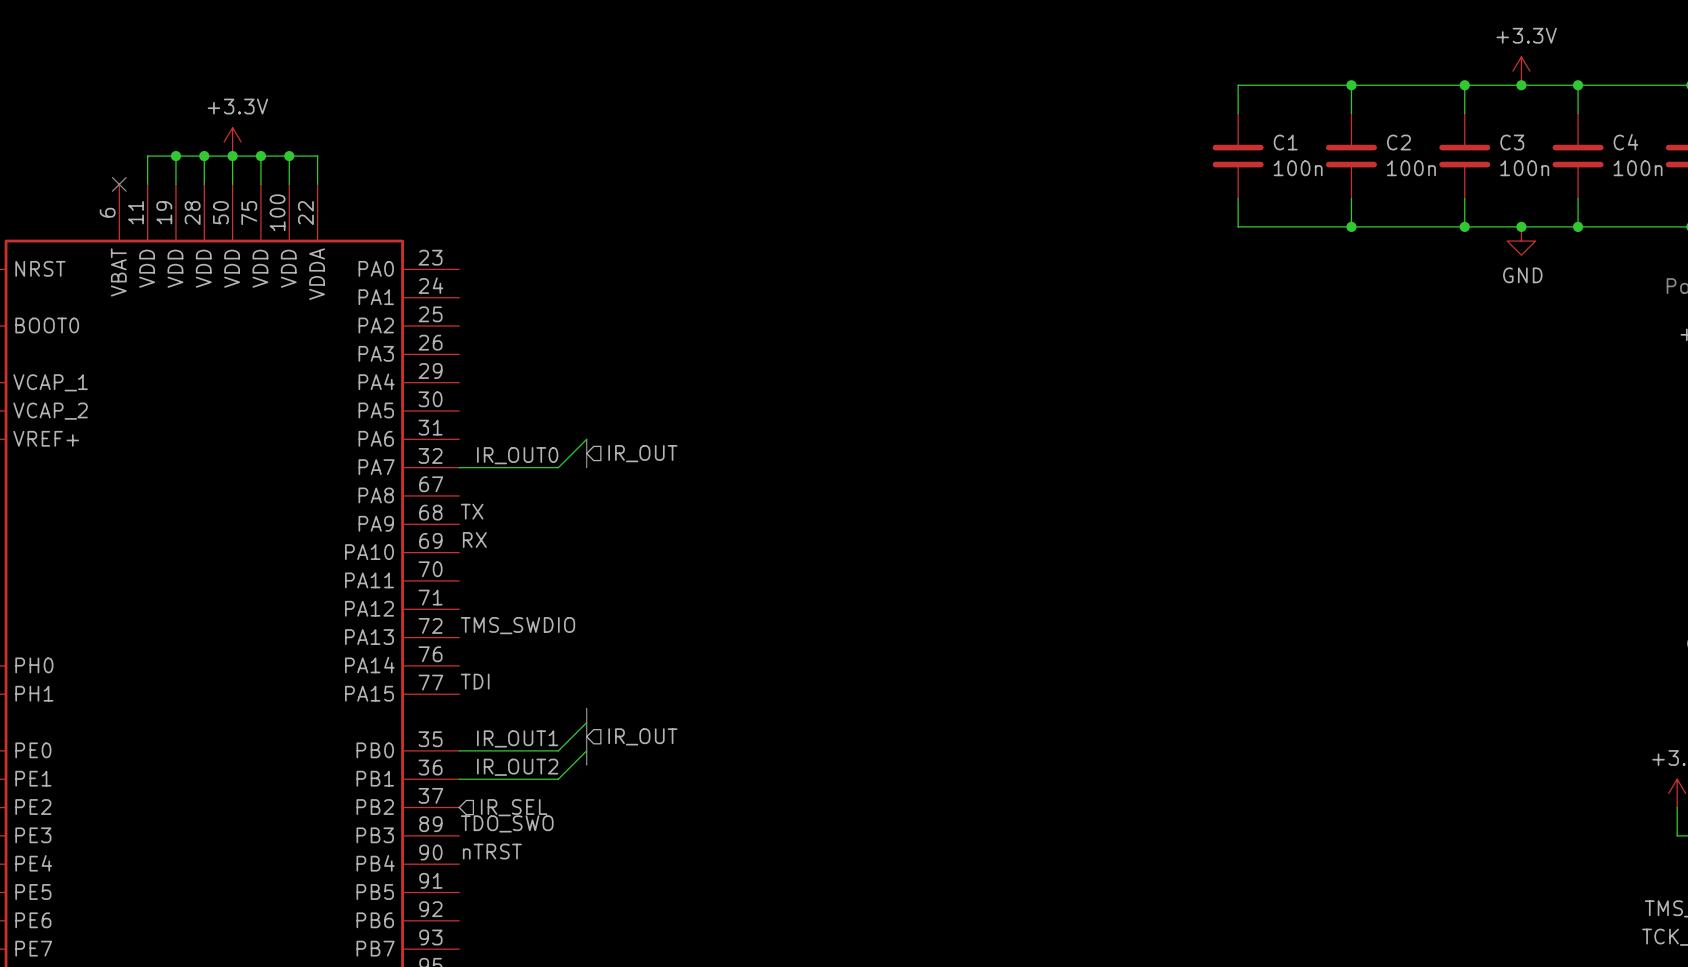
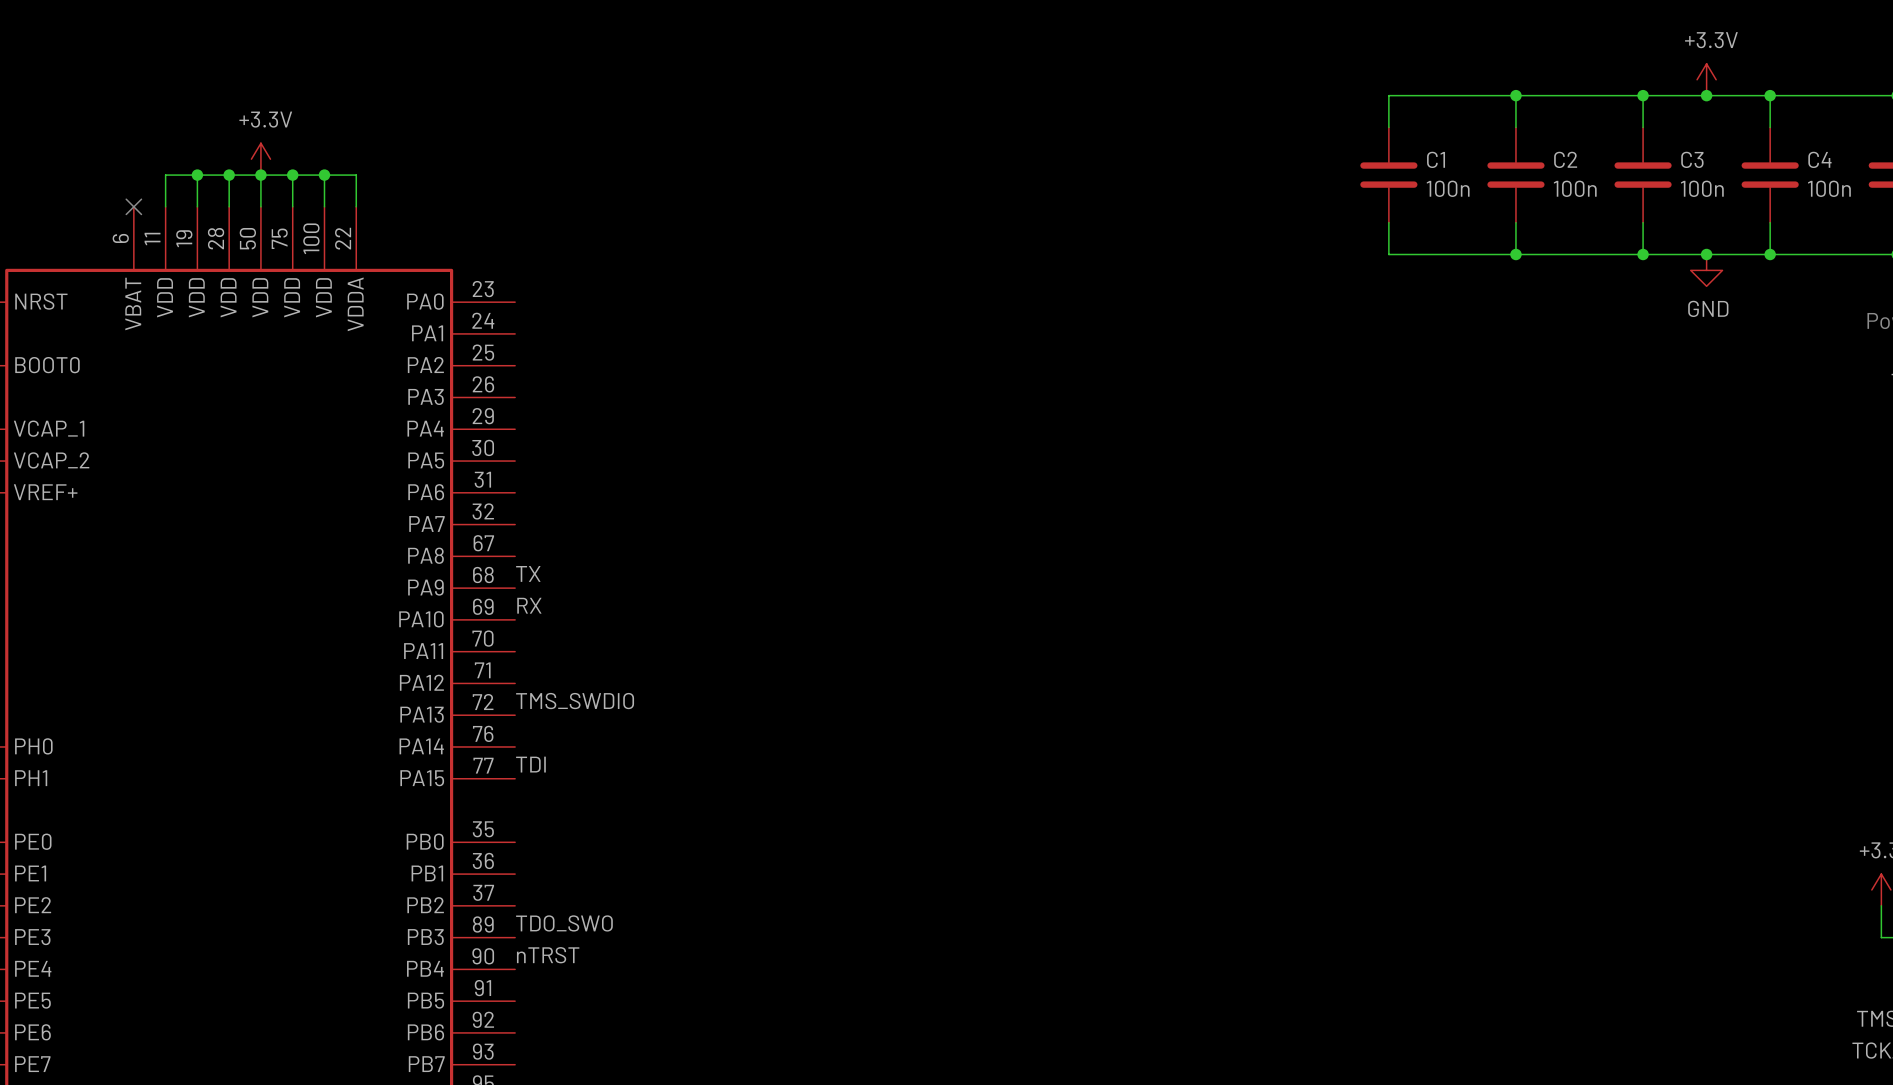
wire: (586, 439) (558, 467) (459, 467) -> none
bus: (586, 439) (586, 467) -> none
hierarchical label: IR_OUT (642, 453) -> none
label: IR_OUT0 (517, 455) -> none
bus: (586, 708) (586, 765) -> none
wire: (586, 722) (558, 750) (459, 750) -> none
hierarchical label: IR_OUT (642, 736) -> none
label: IR_OUT1 (517, 738) -> none
wire: (586, 750) (558, 779) (459, 779) -> none
label: IR_OUT2 (517, 767) -> none
hierarchical label: IR_SEL (514, 807) -> none

